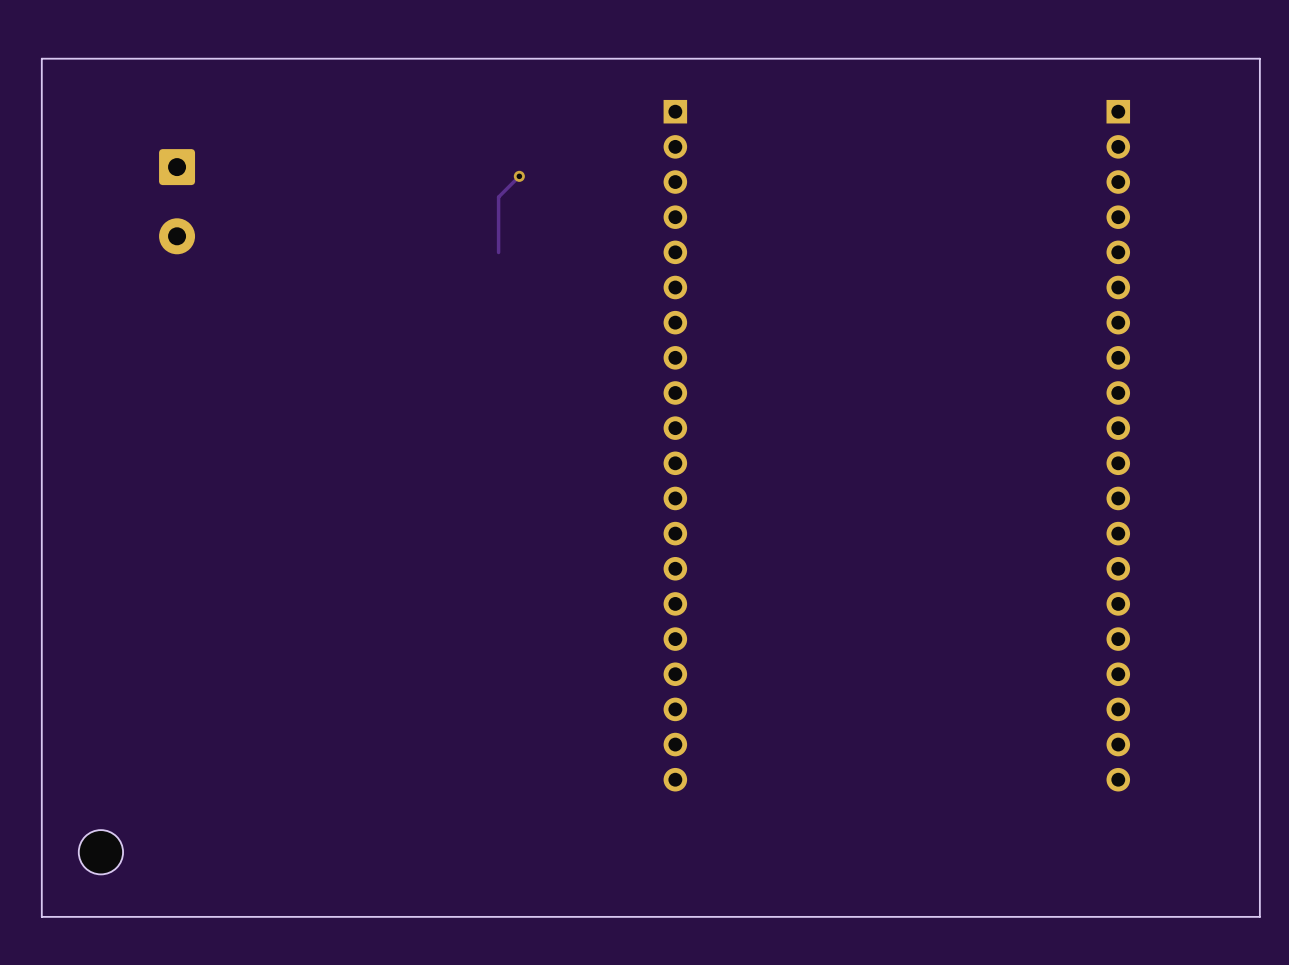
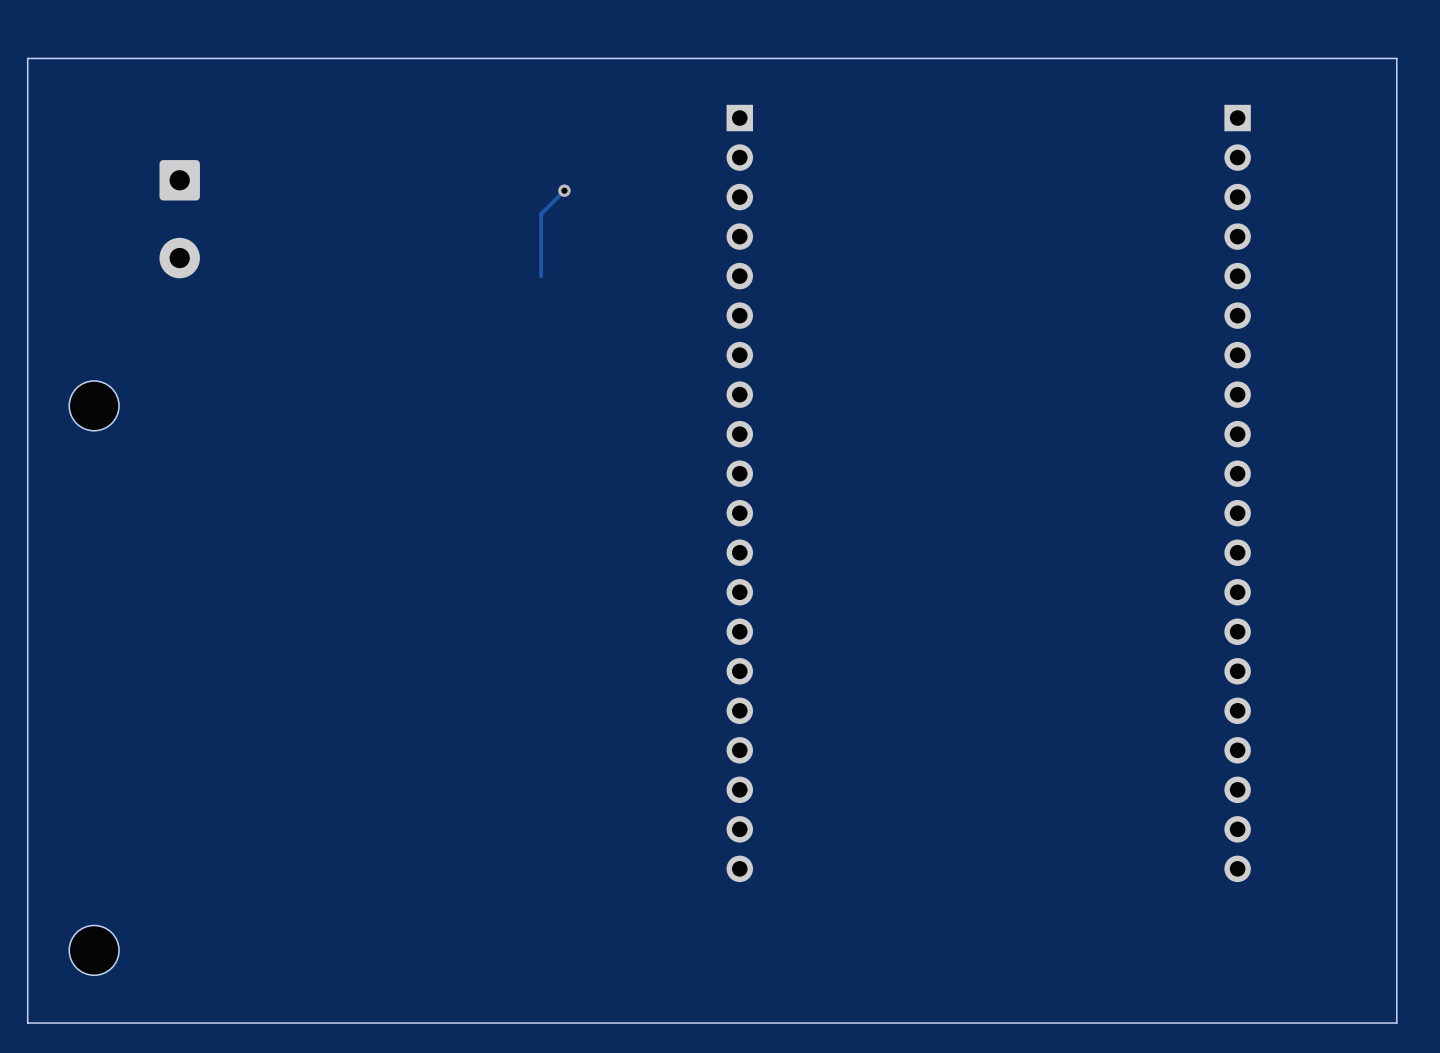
part: none -> (94, 405)

